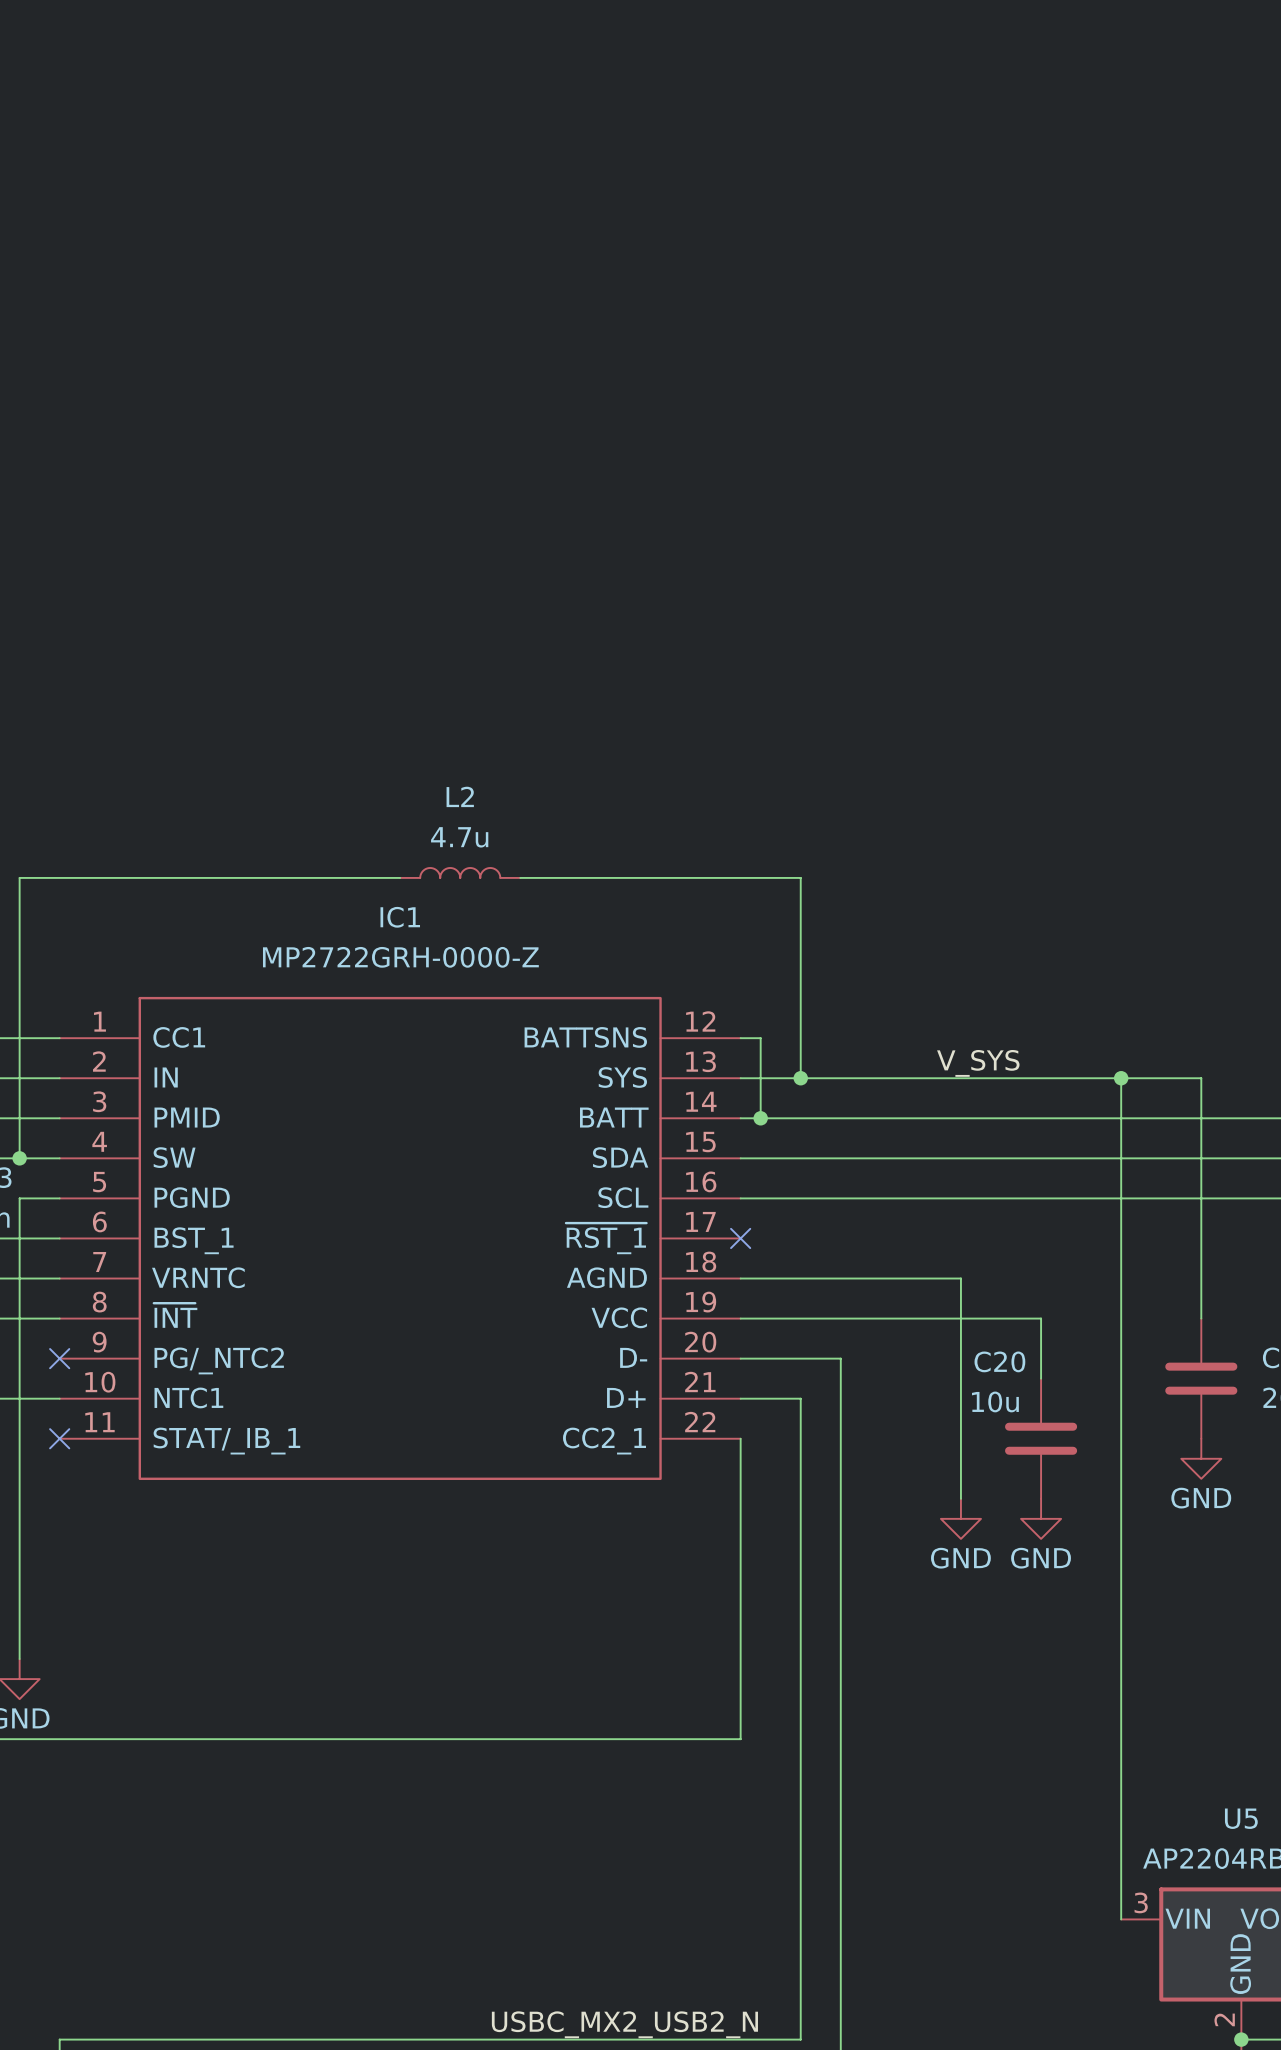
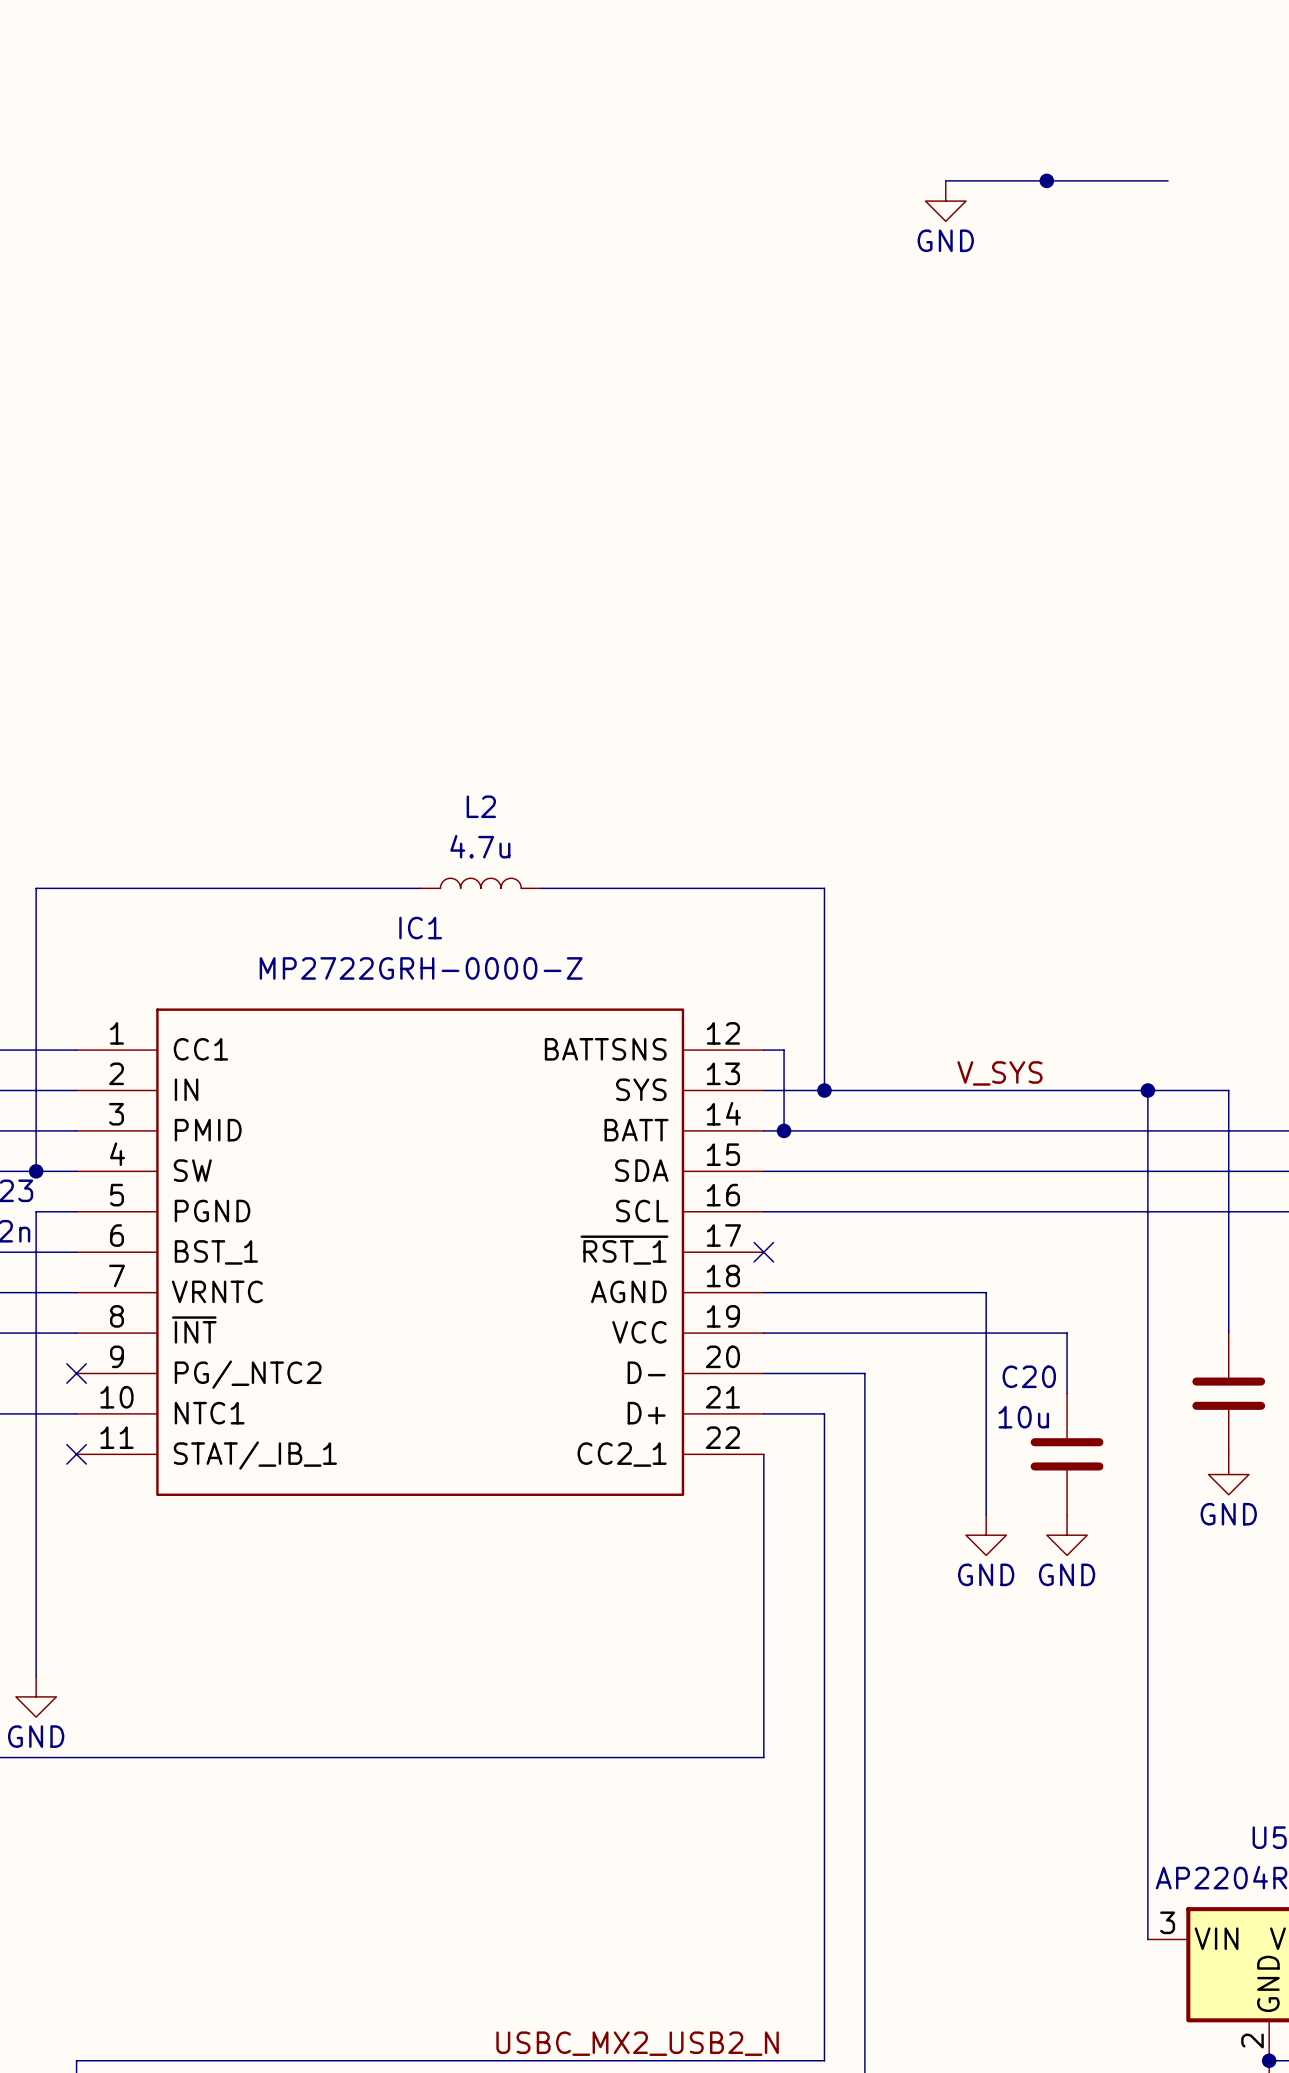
wire: none -> (945, 180) (1168, 180)
junction: none -> (1046, 180)
power symbol: none -> GND (945, 201)

